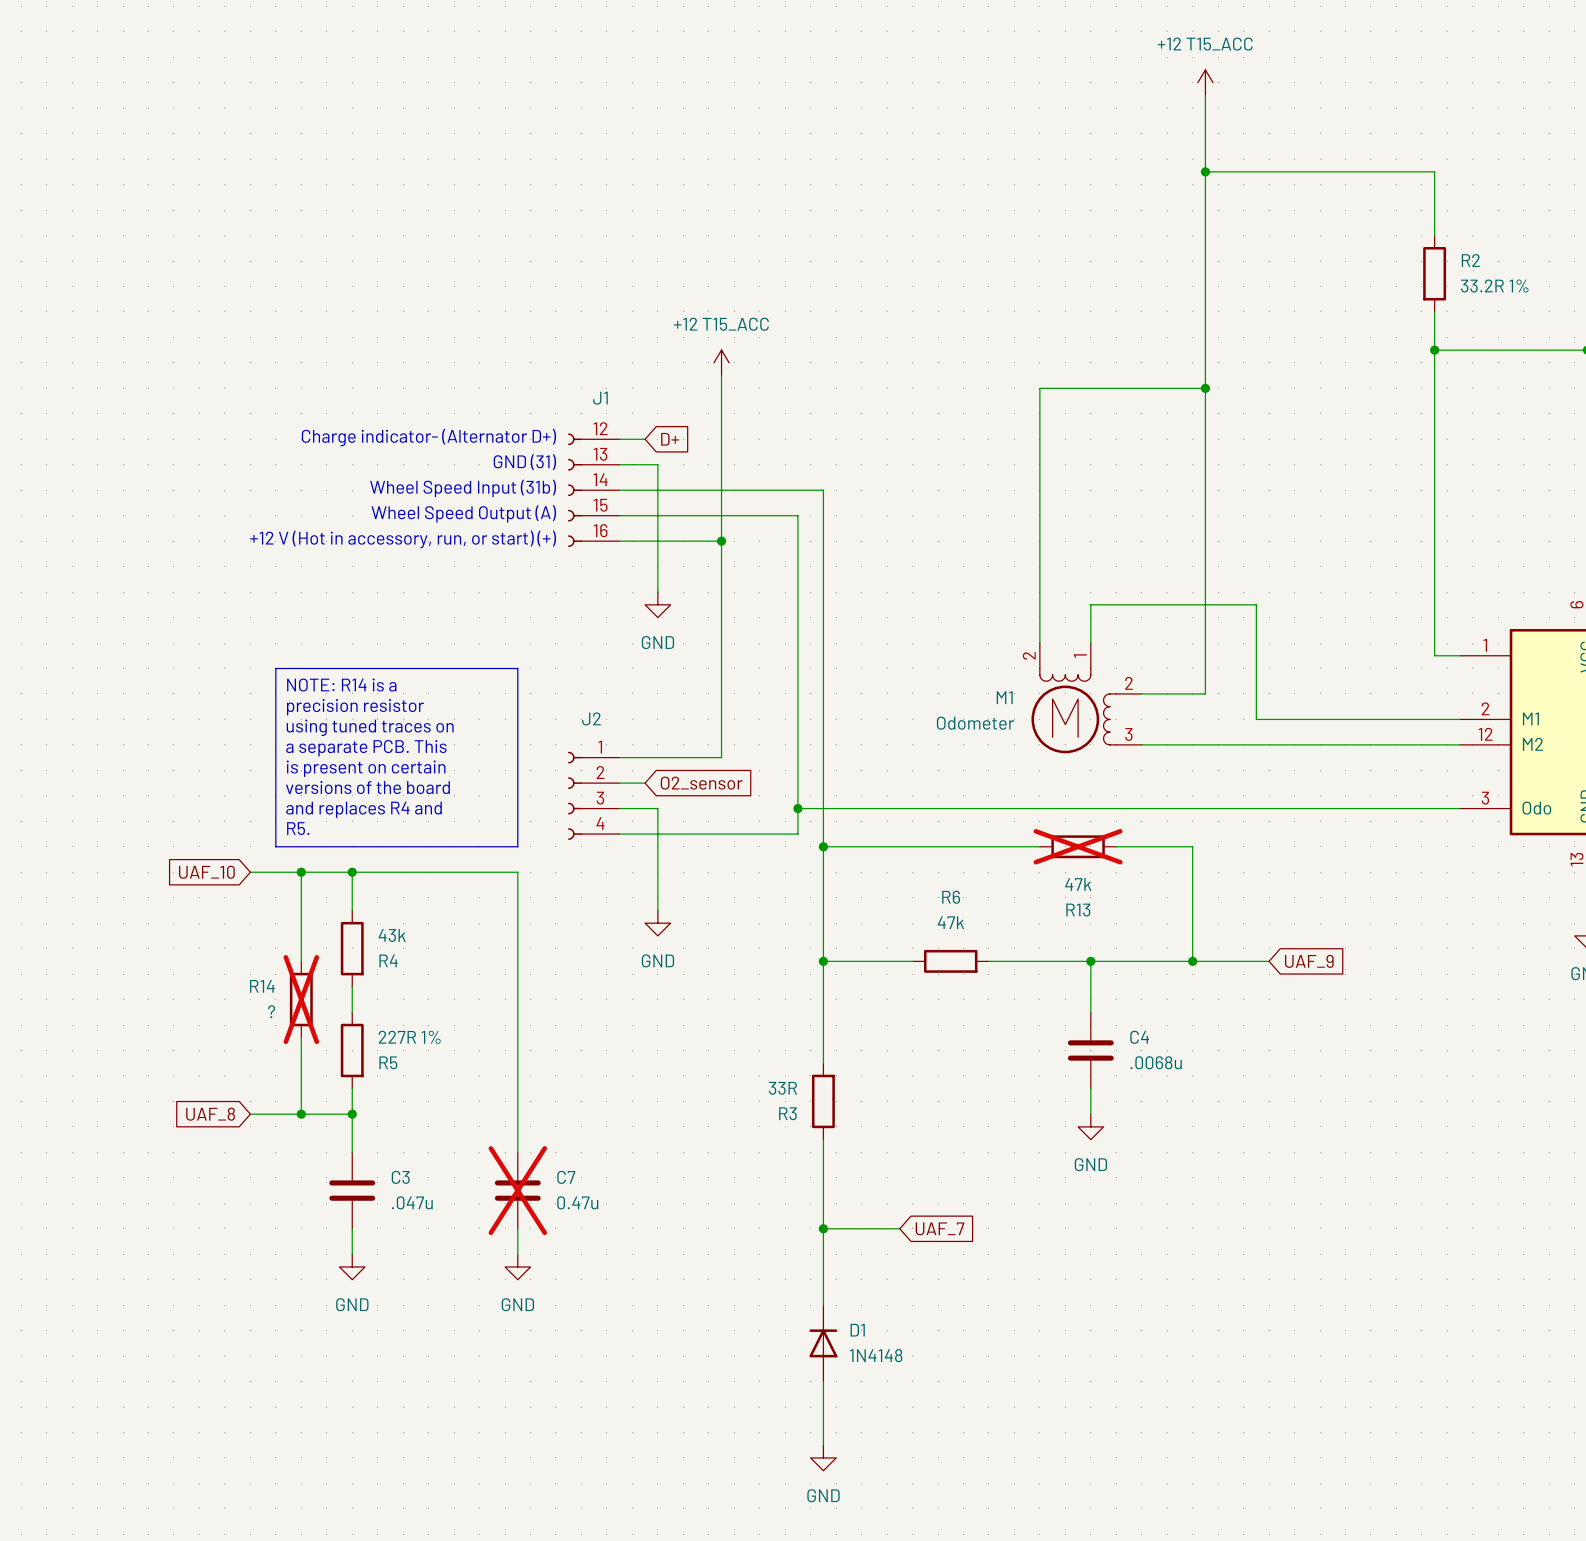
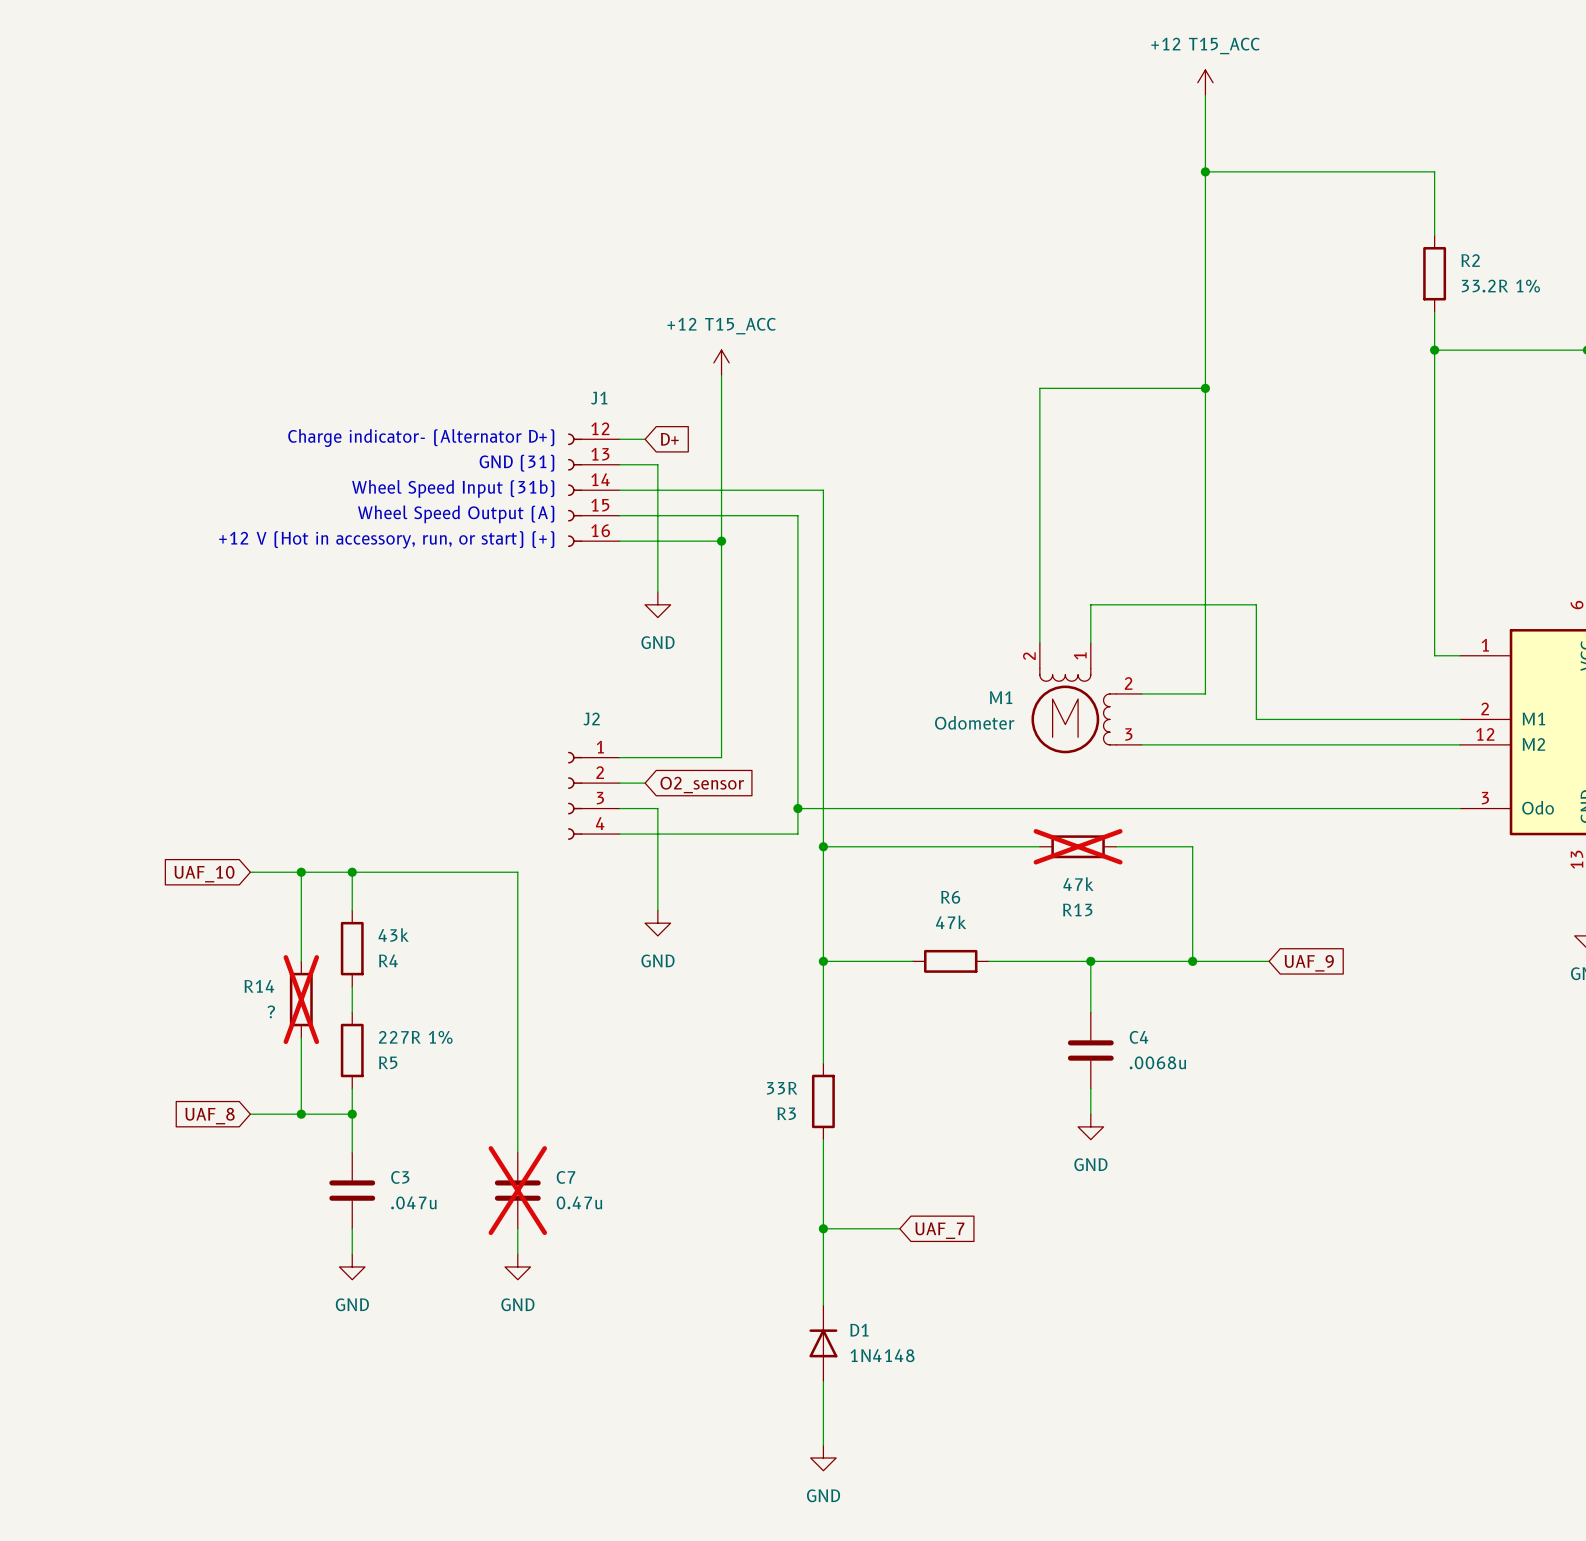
line: (275, 668) (517, 668) (517, 846) (275, 846) (275, 668) -> none
text: NOTE: R14 is a (341, 685) -> none
text: precision resistor (355, 707) -> none
text: using tuned traces on (370, 727) -> none
text: a separate PCB. This (366, 748) -> none
text: is present on certain (366, 768) -> none
text: versions of the board (367, 787) -> none
text: and replaces R4 and (364, 809) -> none
text: R5. (298, 828) -> none

